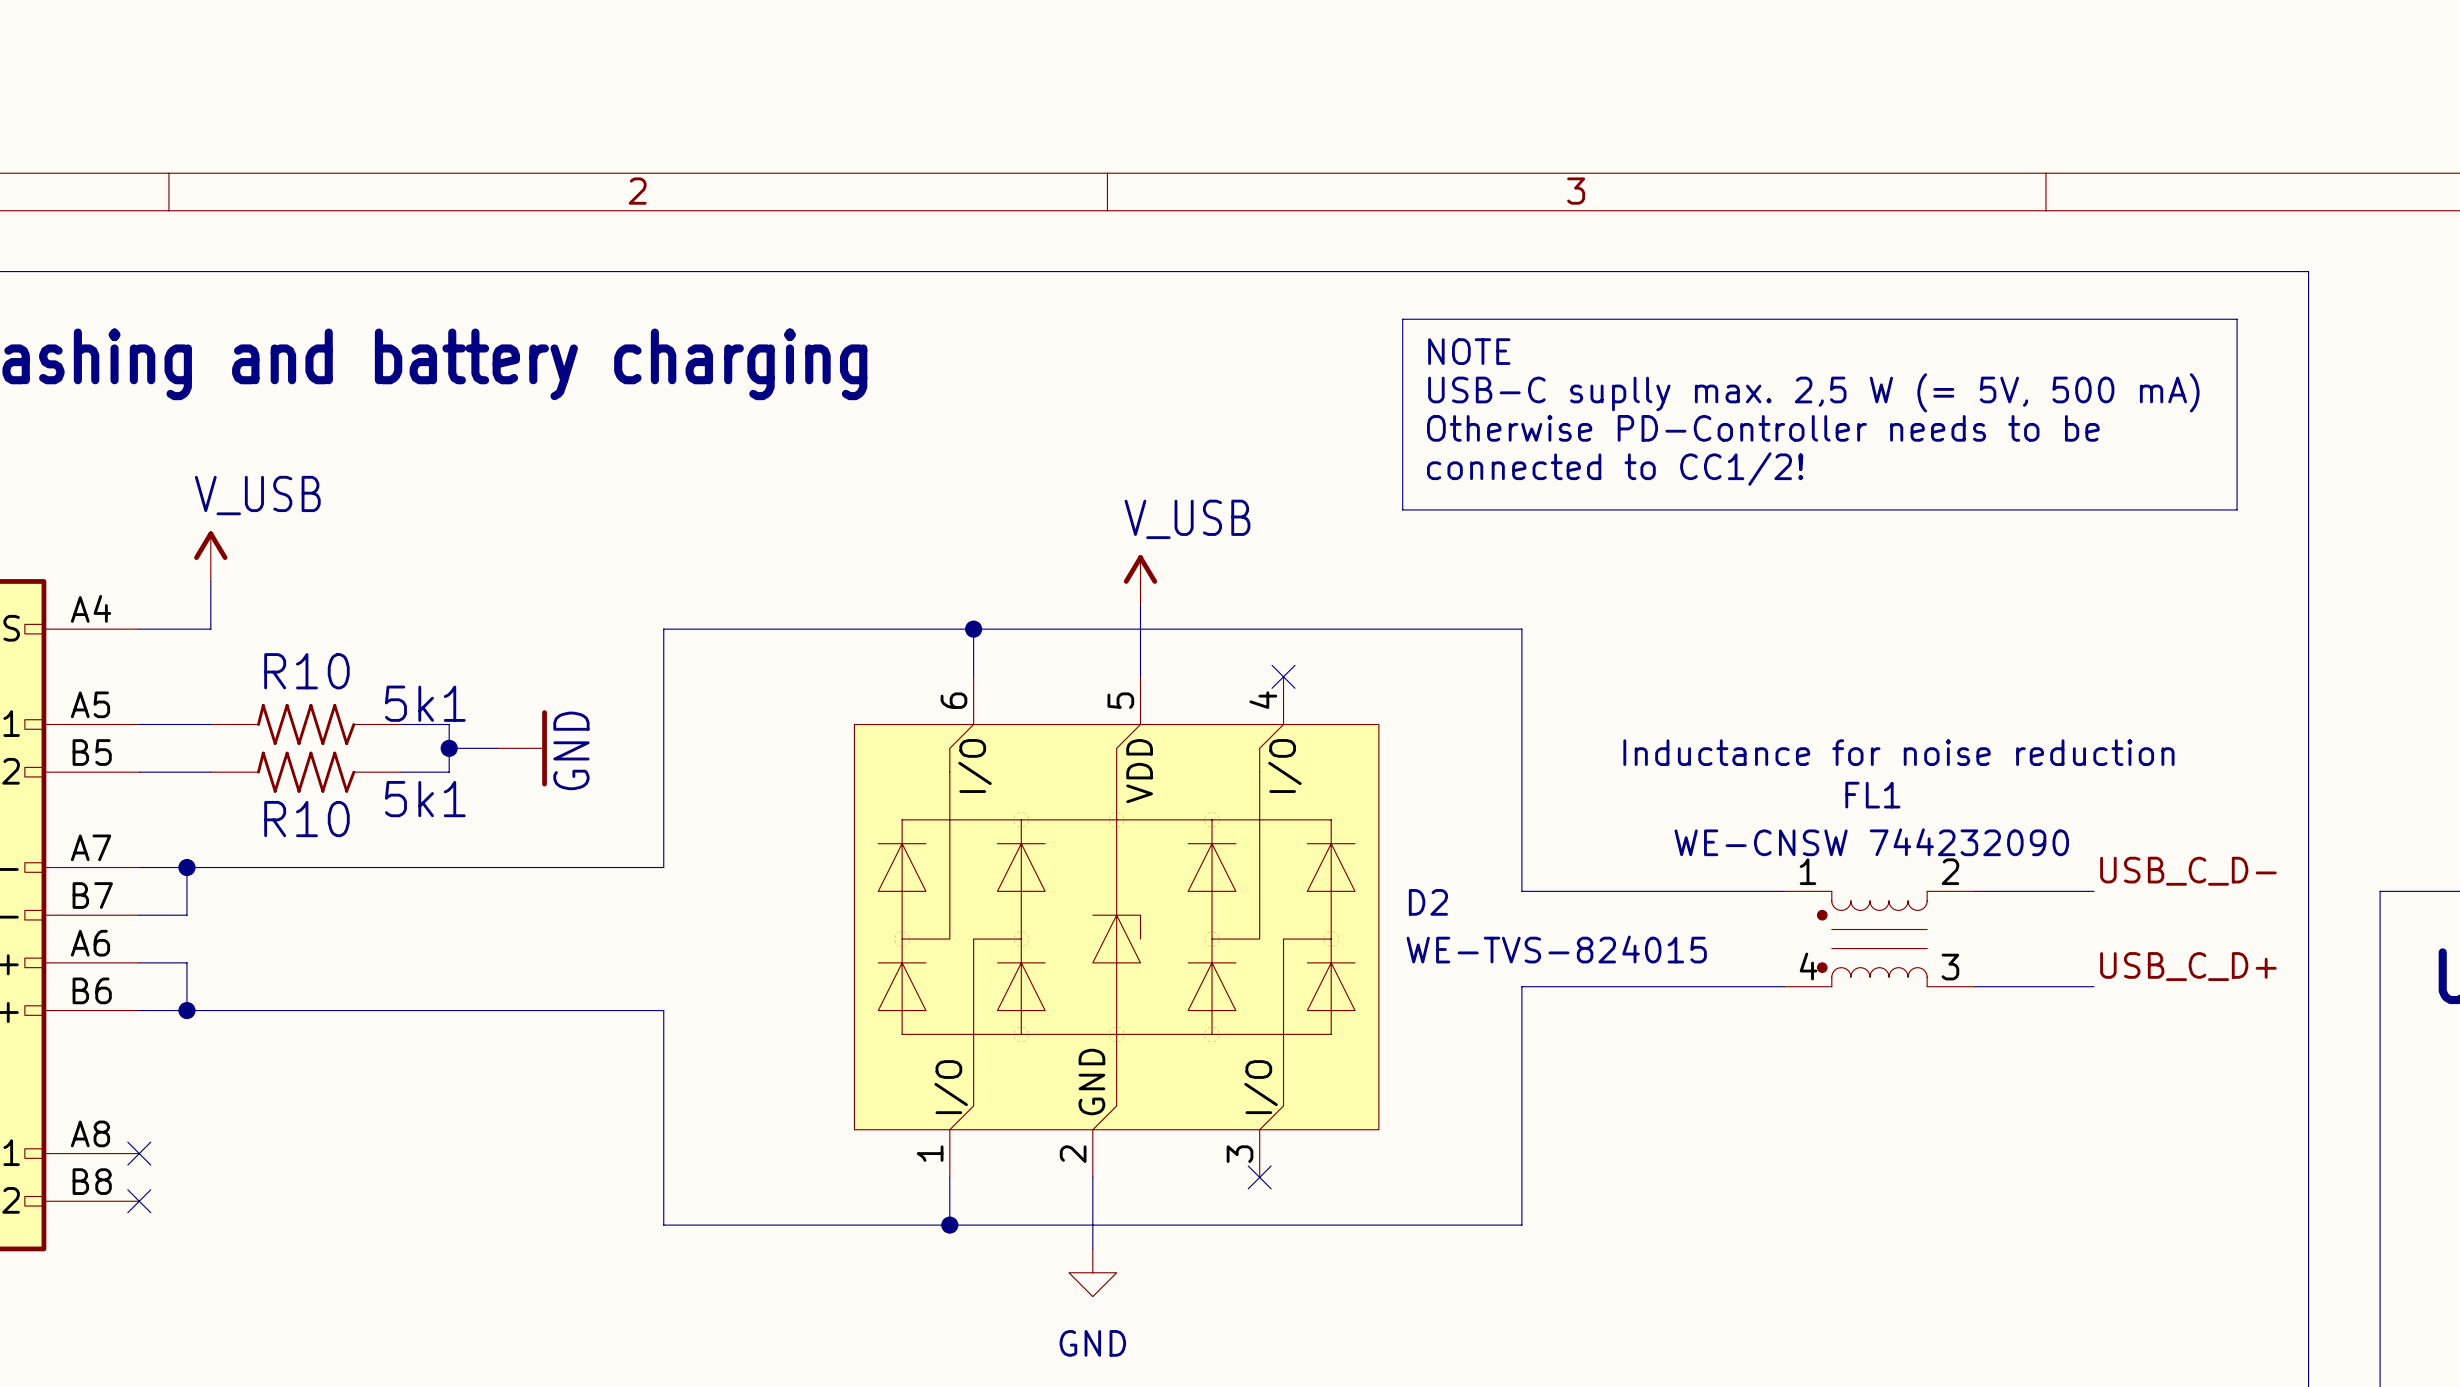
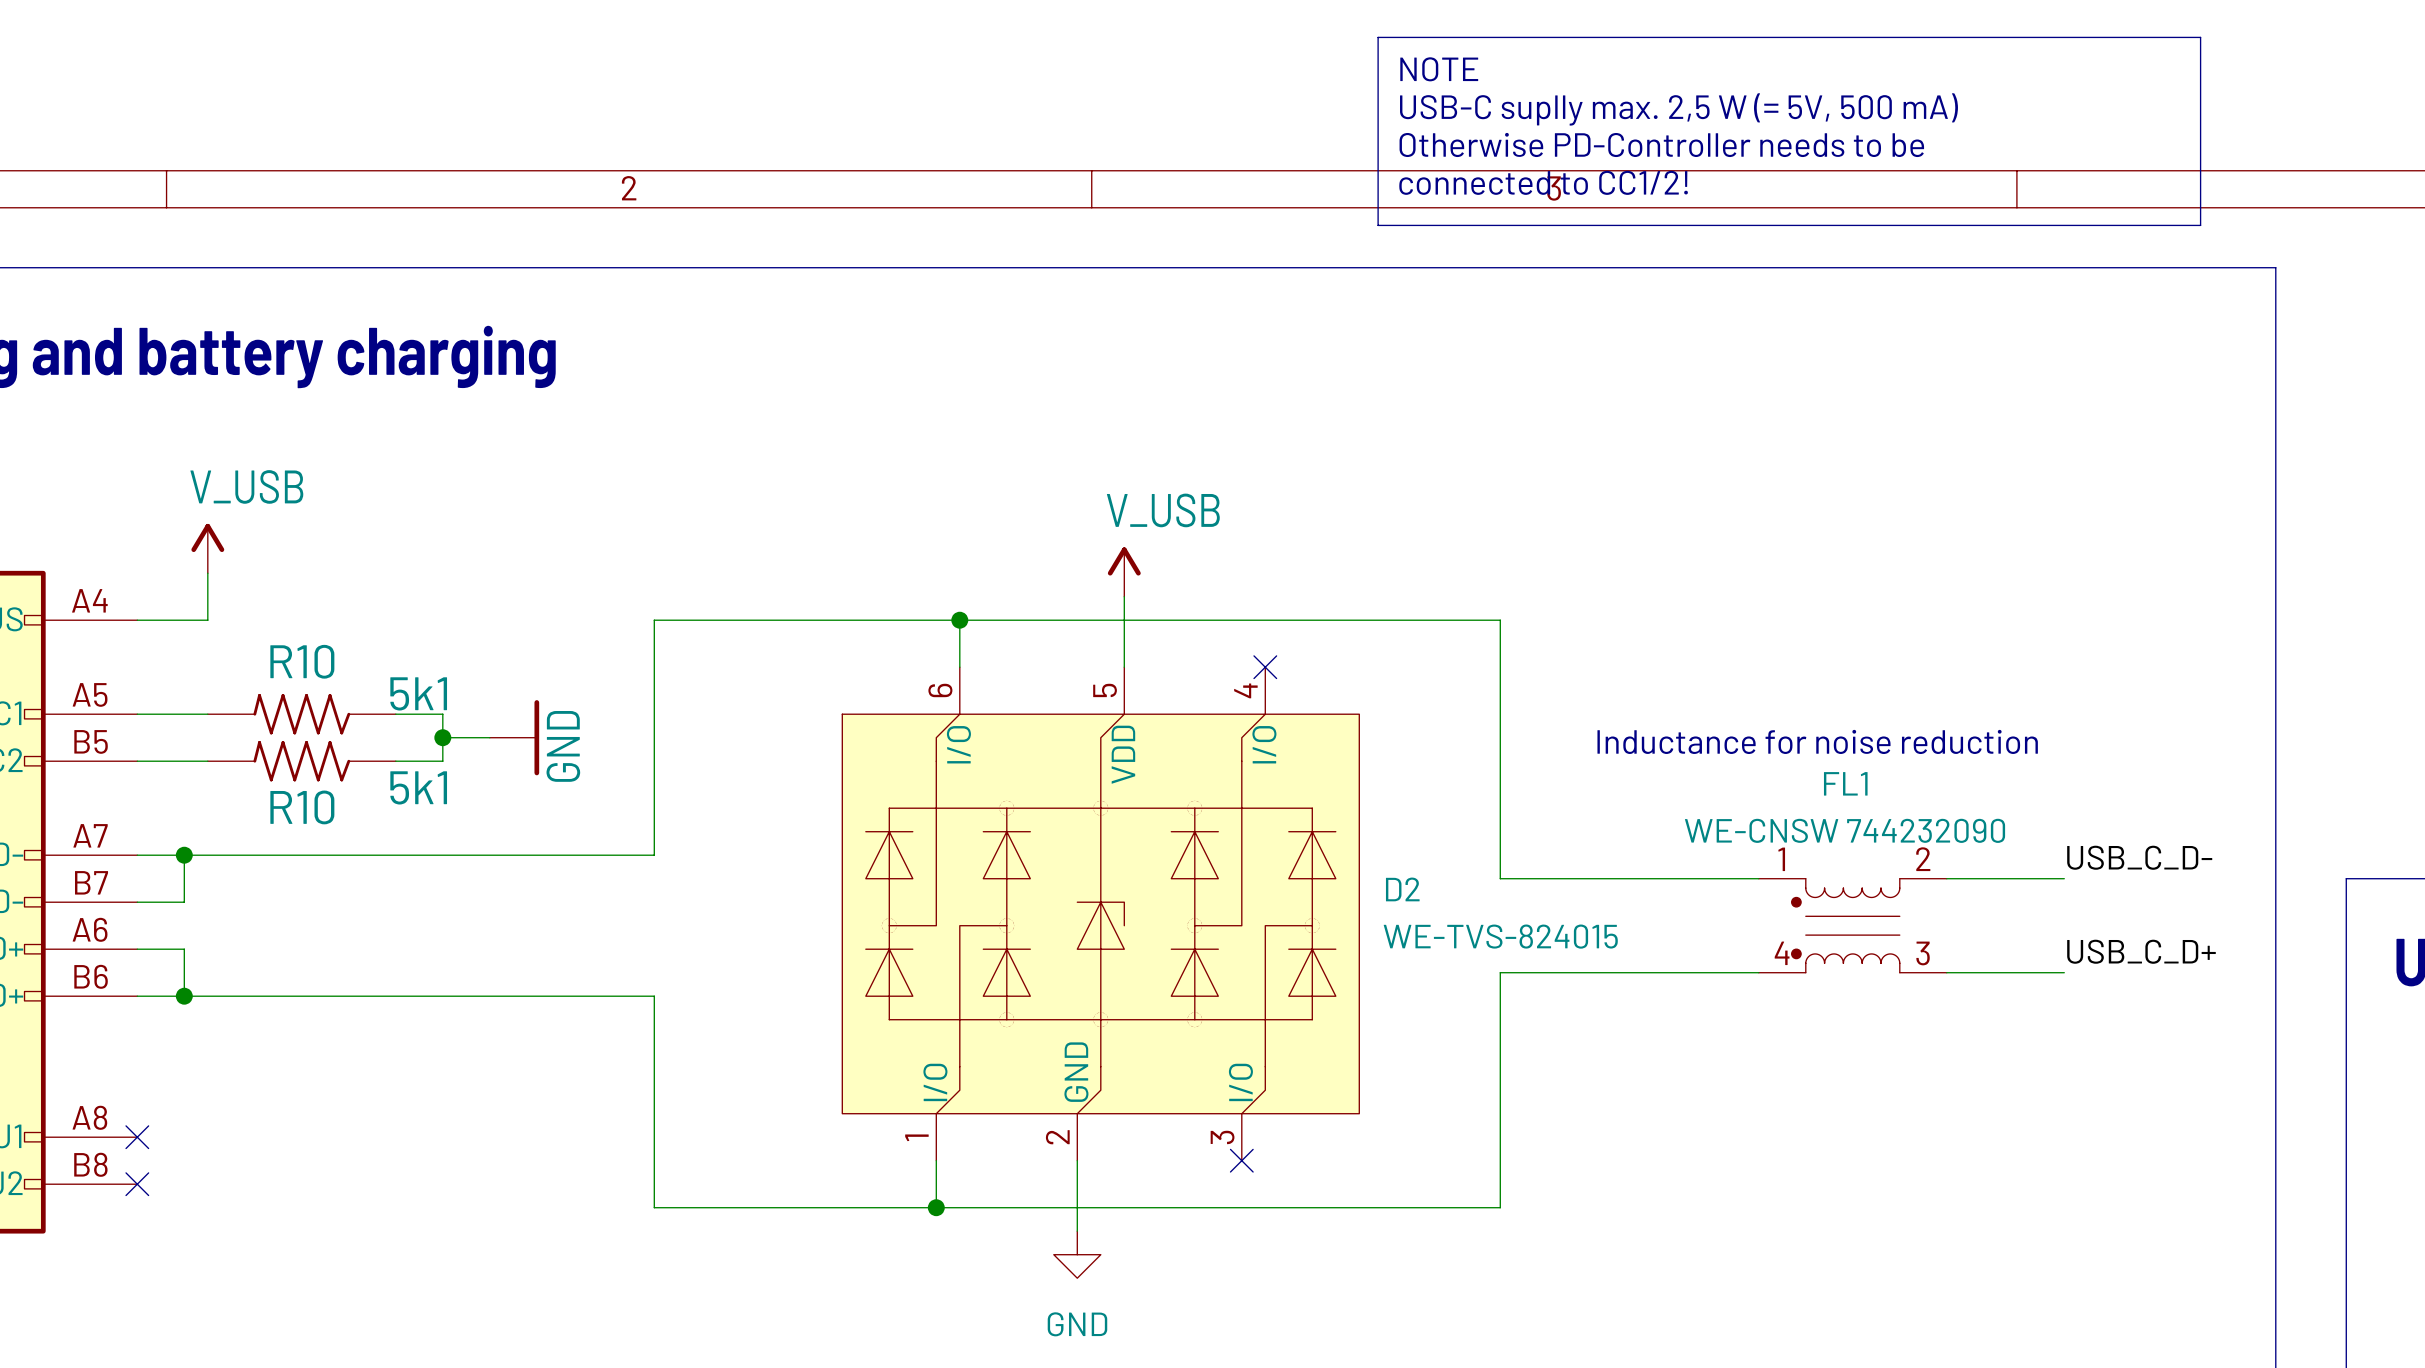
line: (1402, 319) (2237, 319) (2237, 509) (1402, 509) (1402, 319) -> (1378, 37) (2200, 37) (2200, 225) (1378, 225) (1378, 37)
text position: NOTE (1469, 351) -> NOTE (1439, 69)
text position: USB-C suplly max. 2,5 W (= 5V, 500 mA) (1813, 392) -> USB-C suplly max. 2,5 W (= 5V, 500 mA) (1678, 109)
text position: Otherwise PD-Controller needs to be (1763, 428) -> Otherwise PD-Controller needs to be (1661, 144)
text position: connected to CC1/2! (1615, 469) -> connected to CC1/2! (1543, 182)

